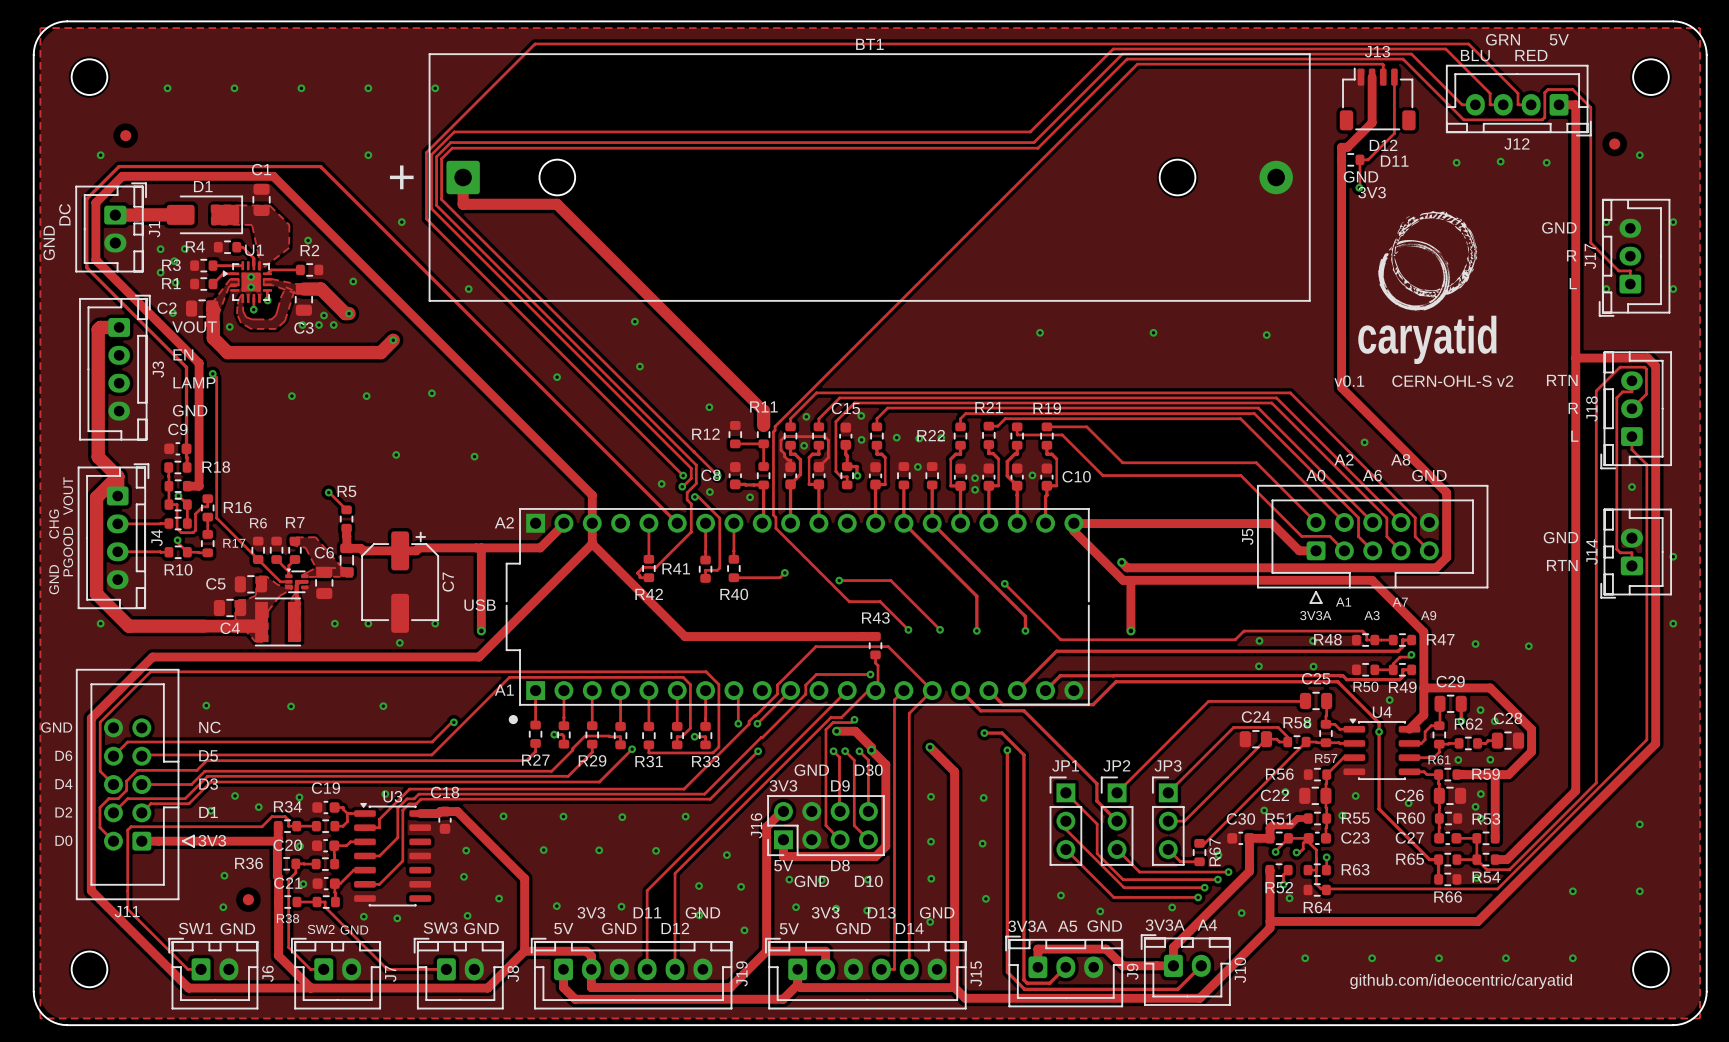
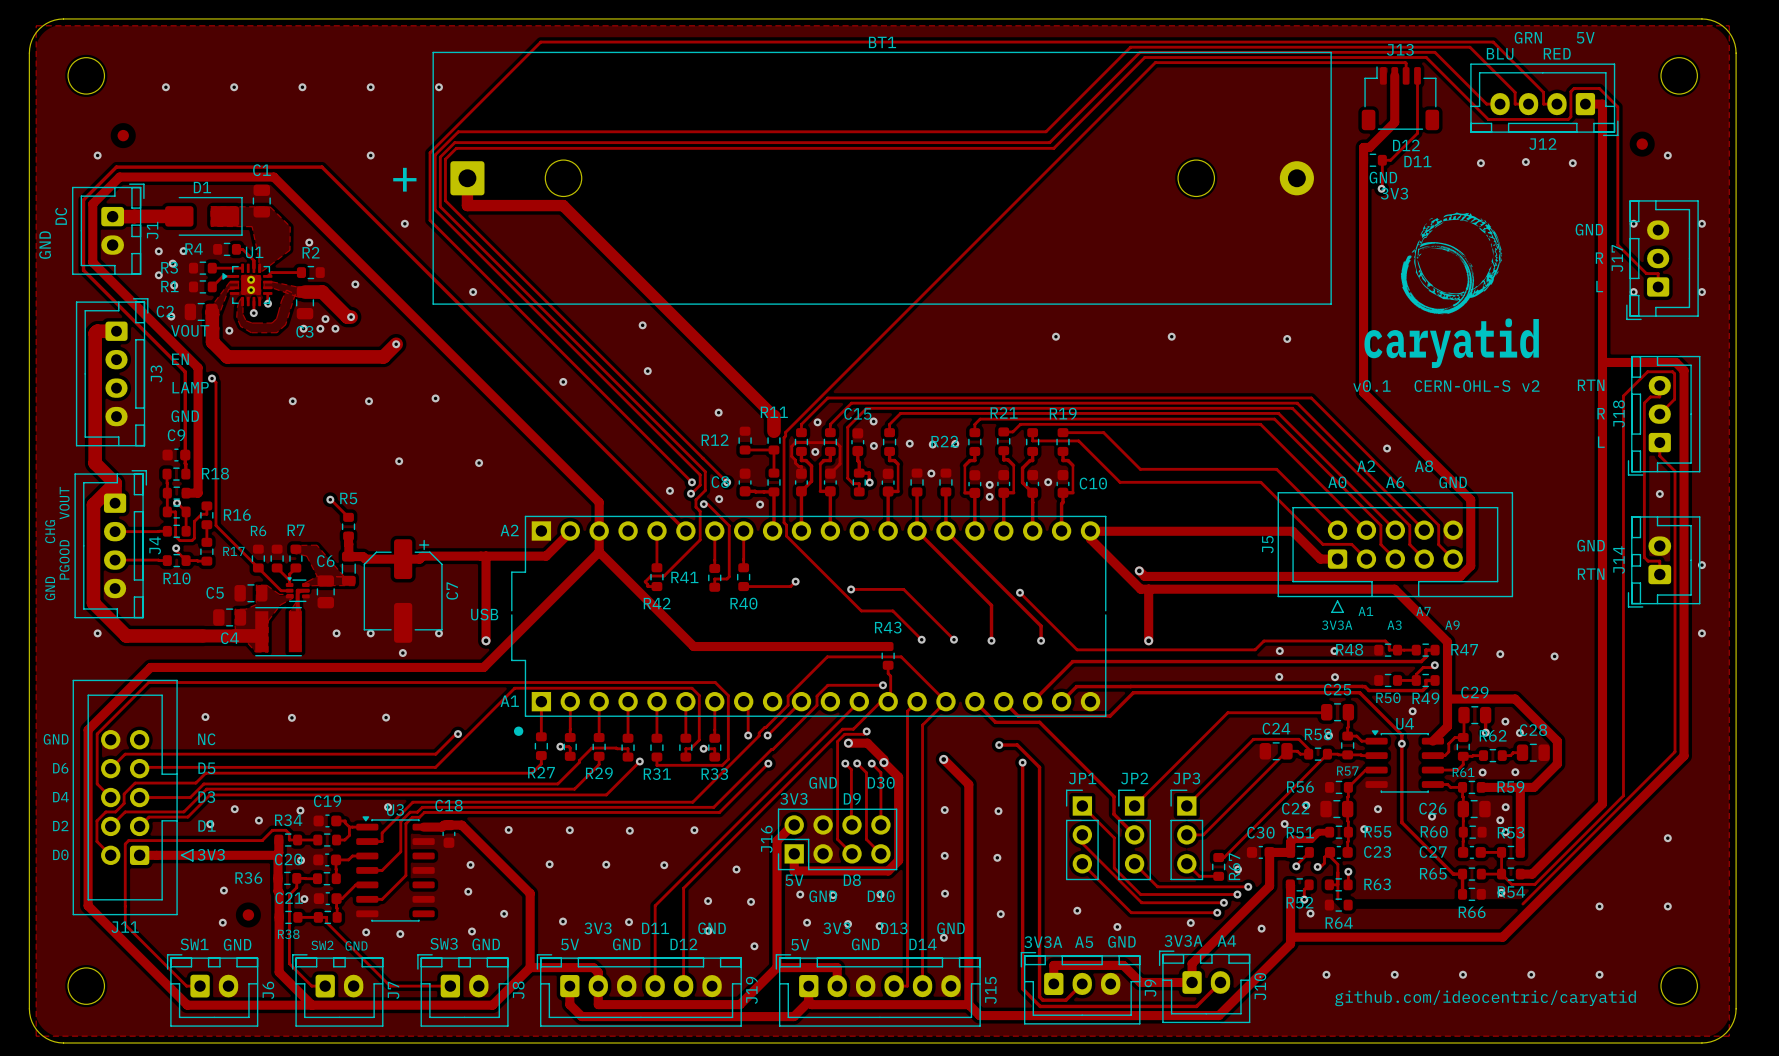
track: (1288, 838) (1307, 838) -> none
track: (1316, 884) (1321, 888) (1497, 888) -> none

